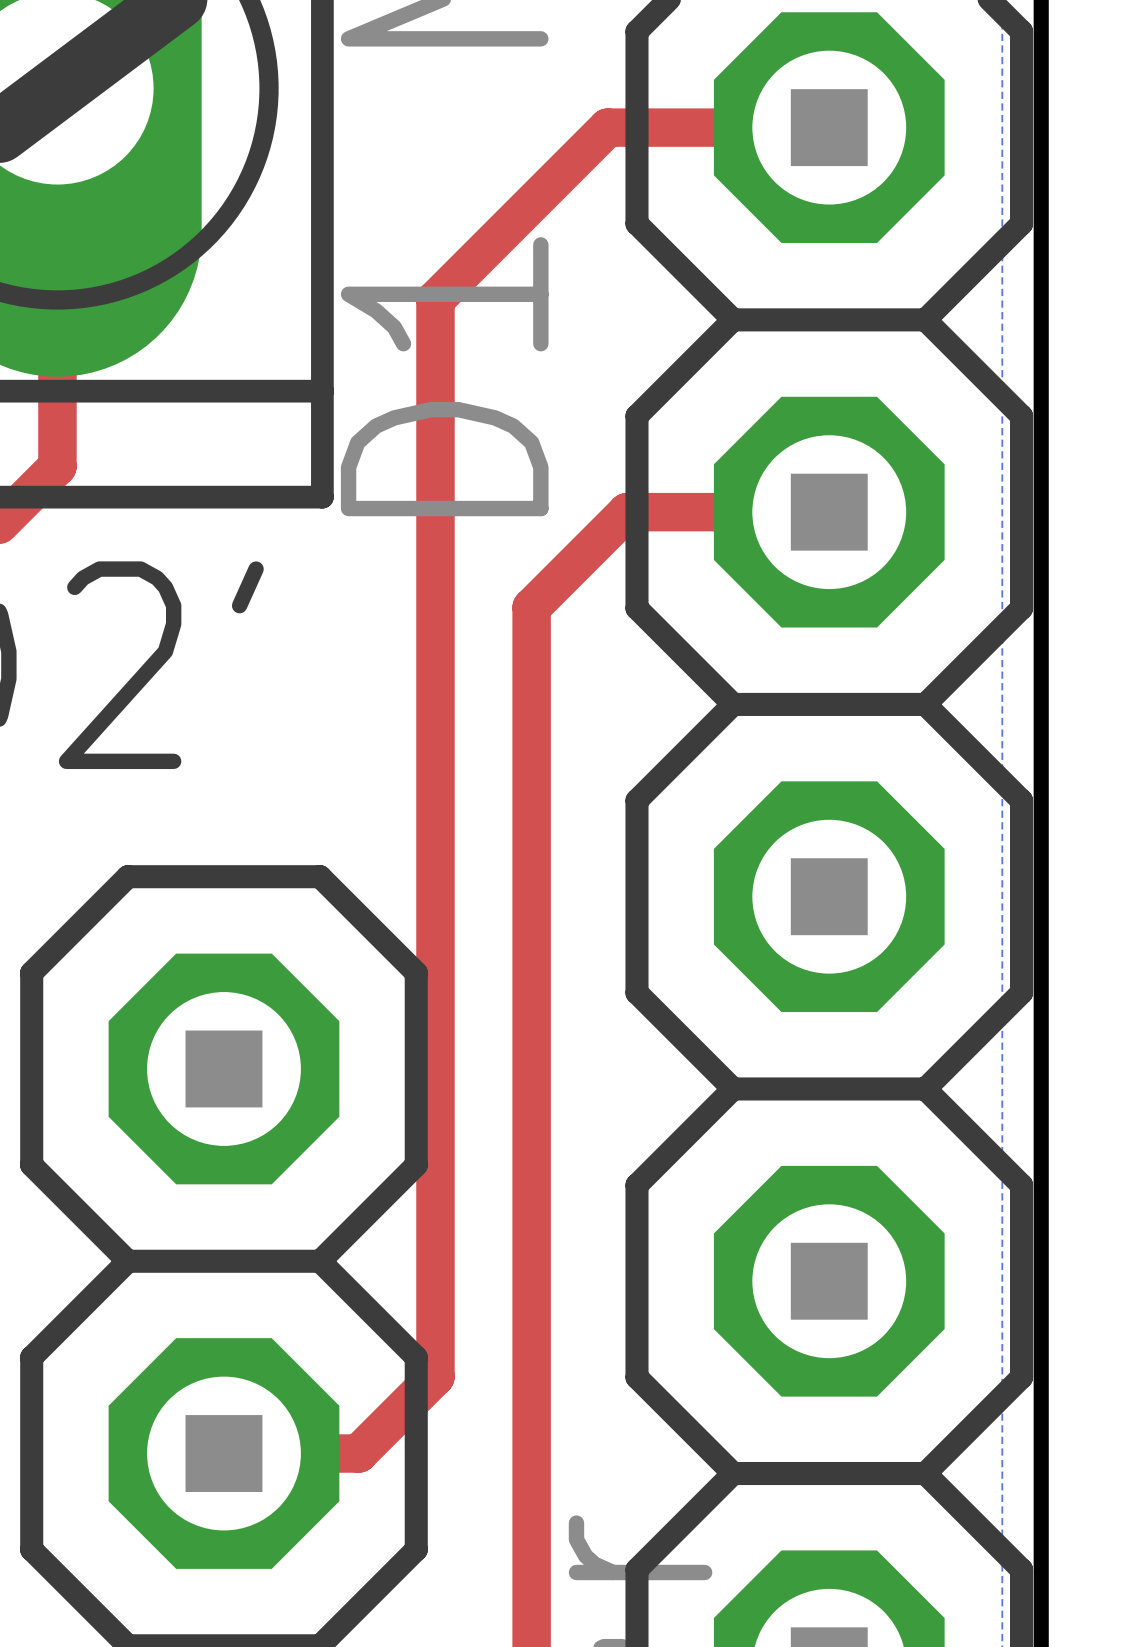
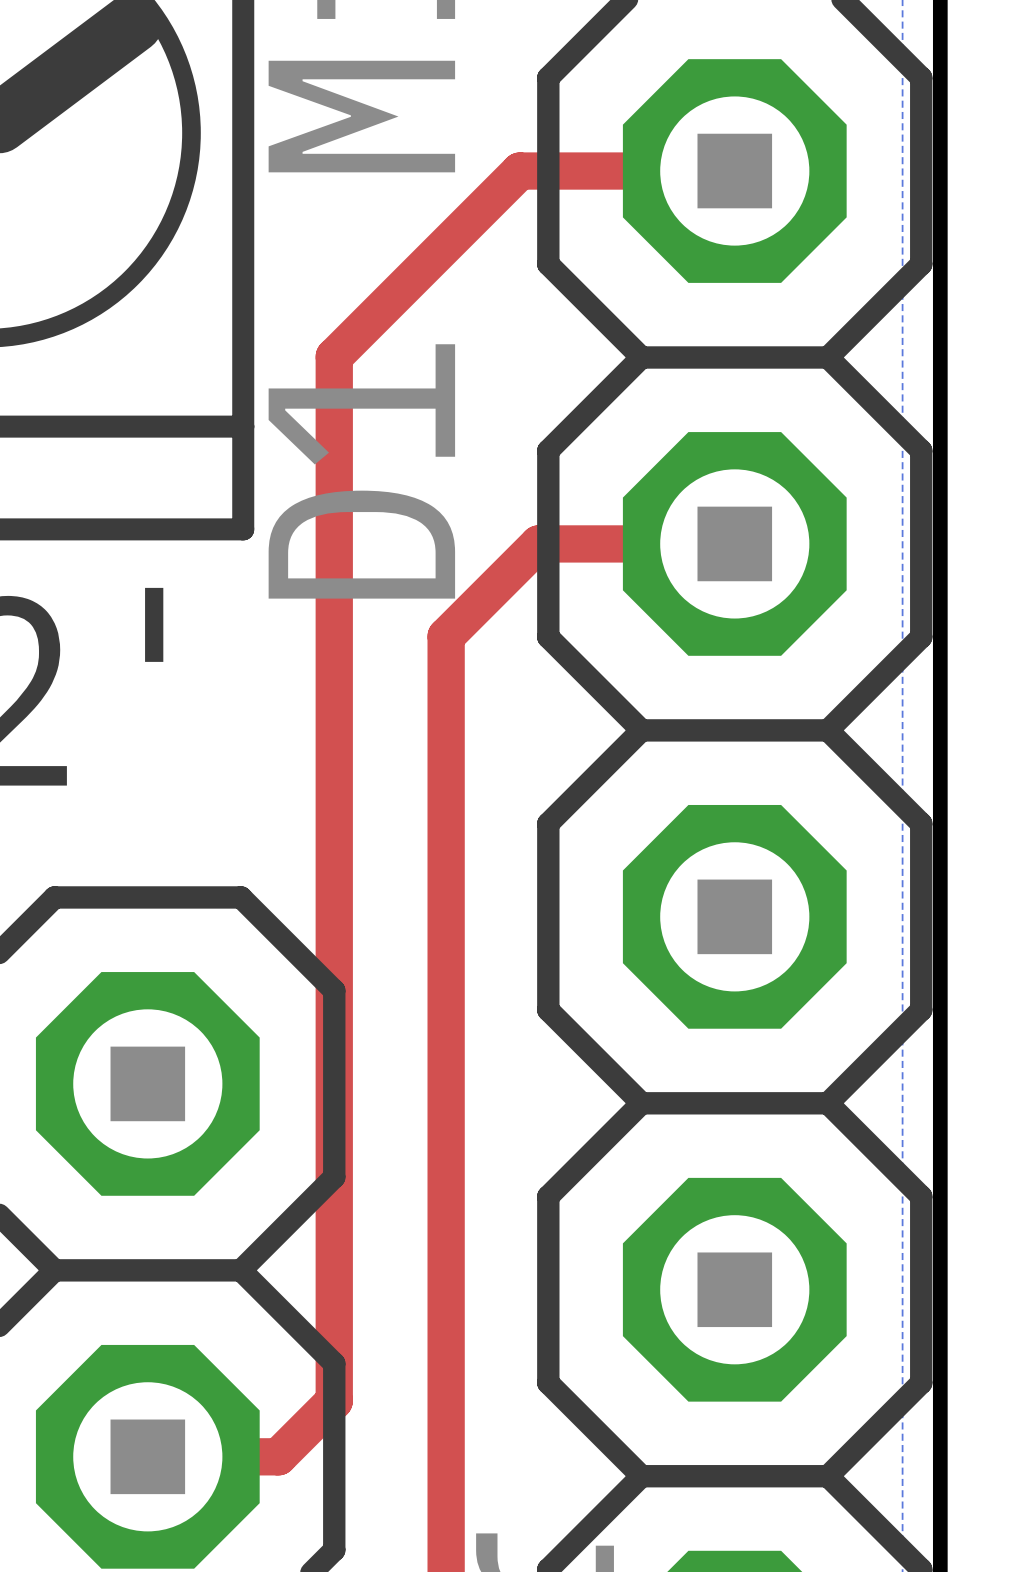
top track: (435, 299) (435, 1376) (416, 1395) -> (352, 338) (334, 356) (334, 1400)

